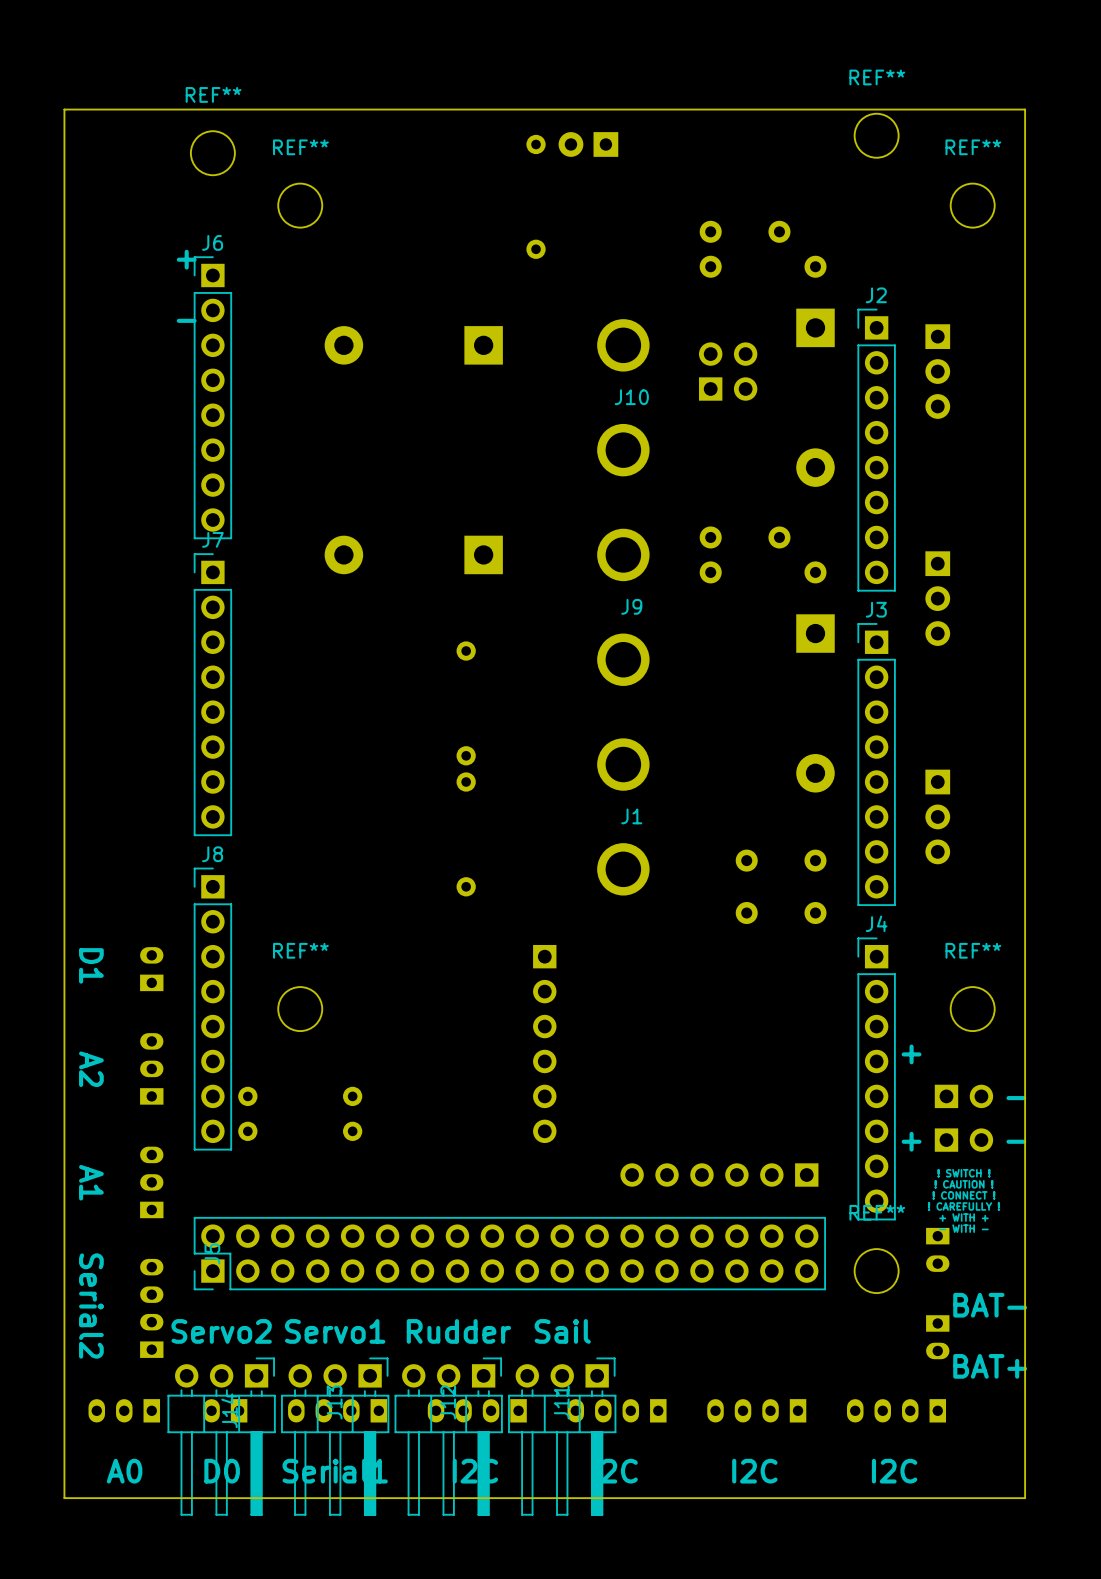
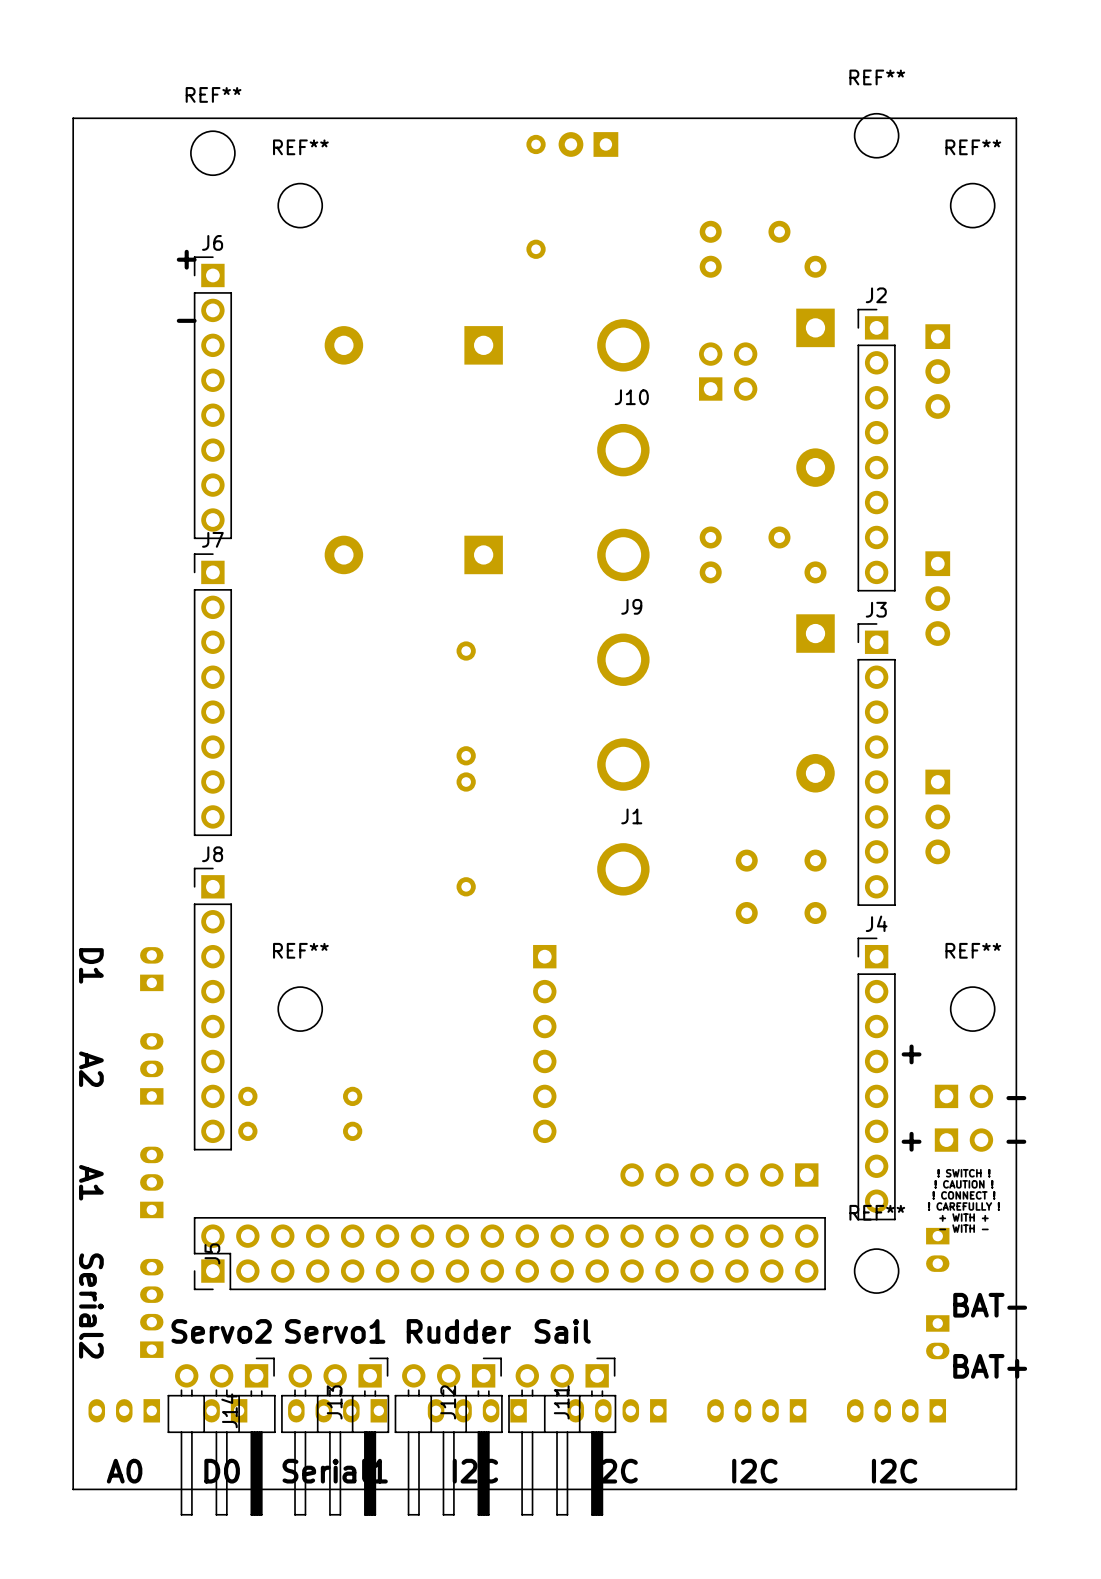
board edge: (64, 109) (64, 1498) (1025, 1498) (1025, 109) (64, 109) -> (73, 118) (73, 1489) (1016, 1489) (1016, 118) (73, 118)

